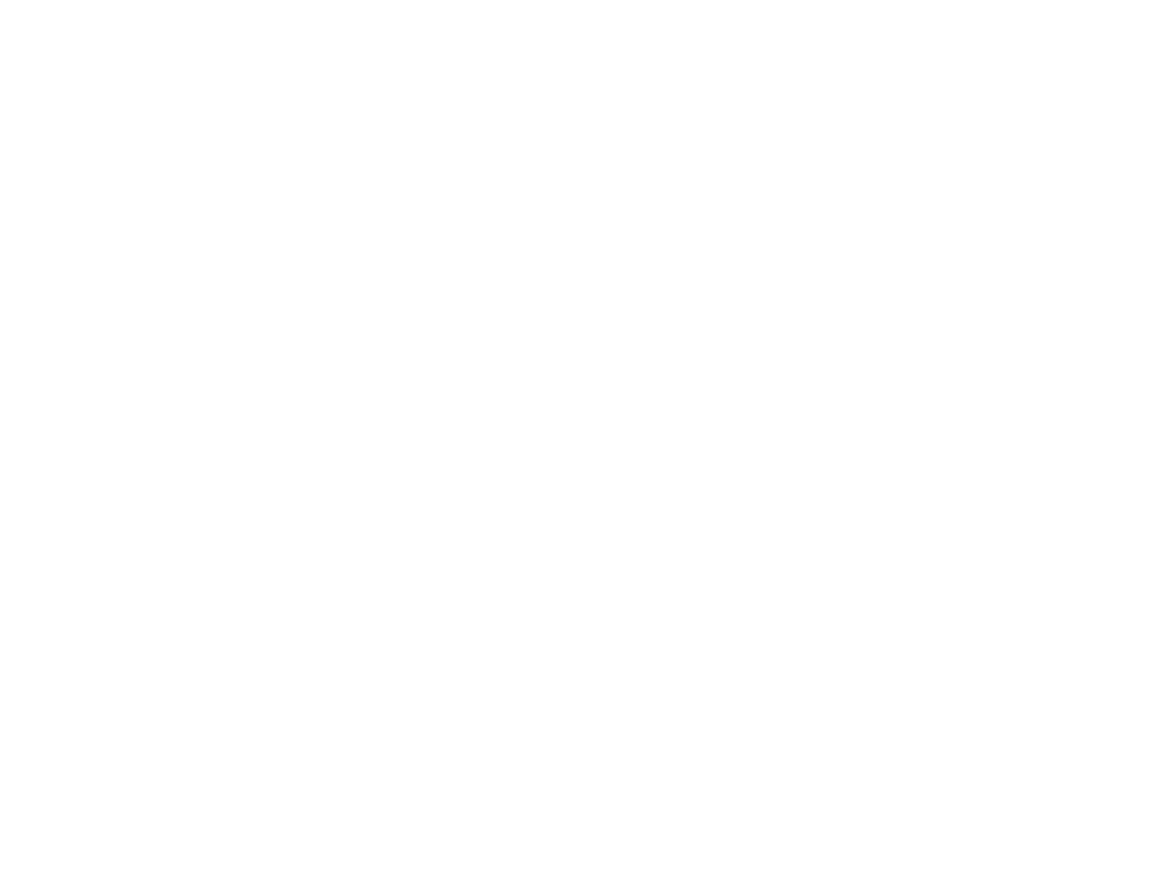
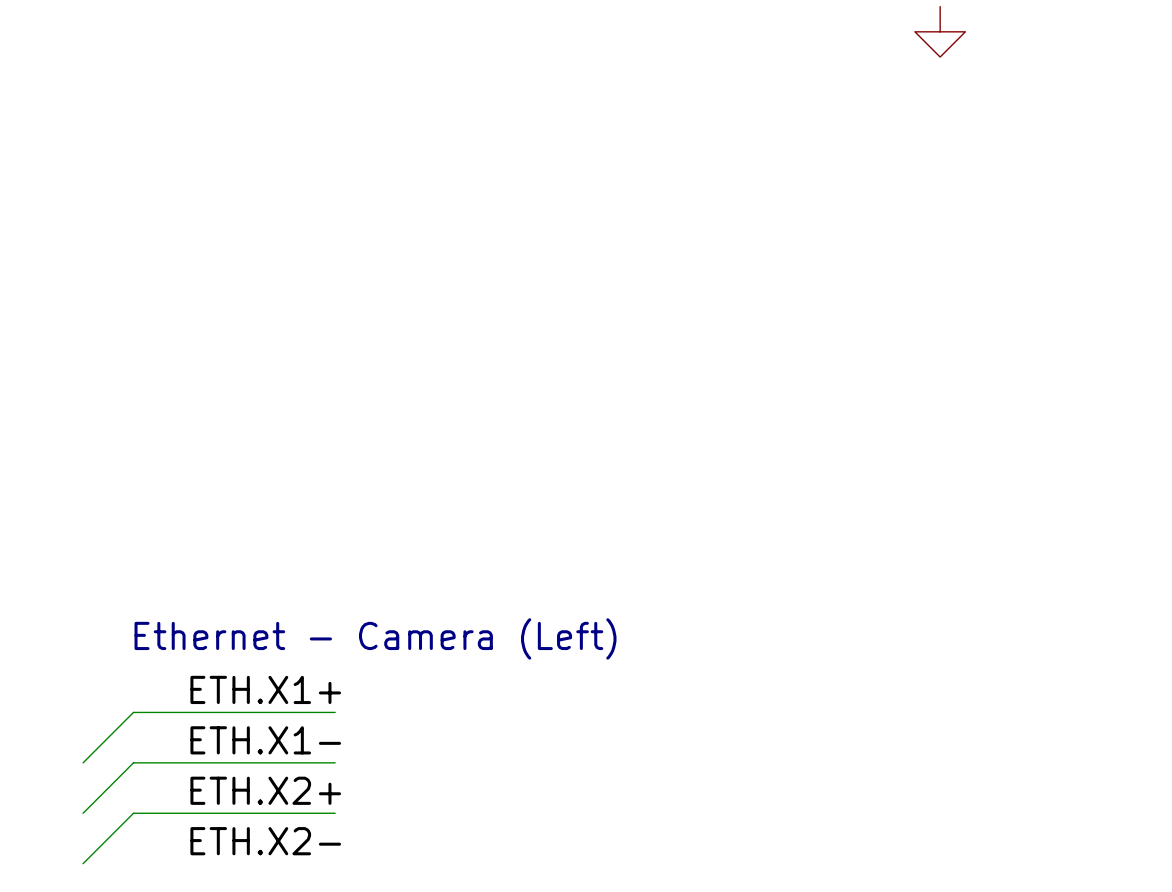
power symbol: none -> (940, 31)
text: none -> Ethernet - Camera (Left) (375, 638)
label: none -> ETH.X1+ (265, 689)
wire: none -> (335, 712) (133, 712) (83, 762)
label: none -> ETH.X1- (265, 740)
wire: none -> (335, 762) (133, 762) (83, 813)
label: none -> ETH.X2+ (265, 790)
wire: none -> (335, 813) (133, 813) (83, 863)
label: none -> ETH.X2- (265, 841)

